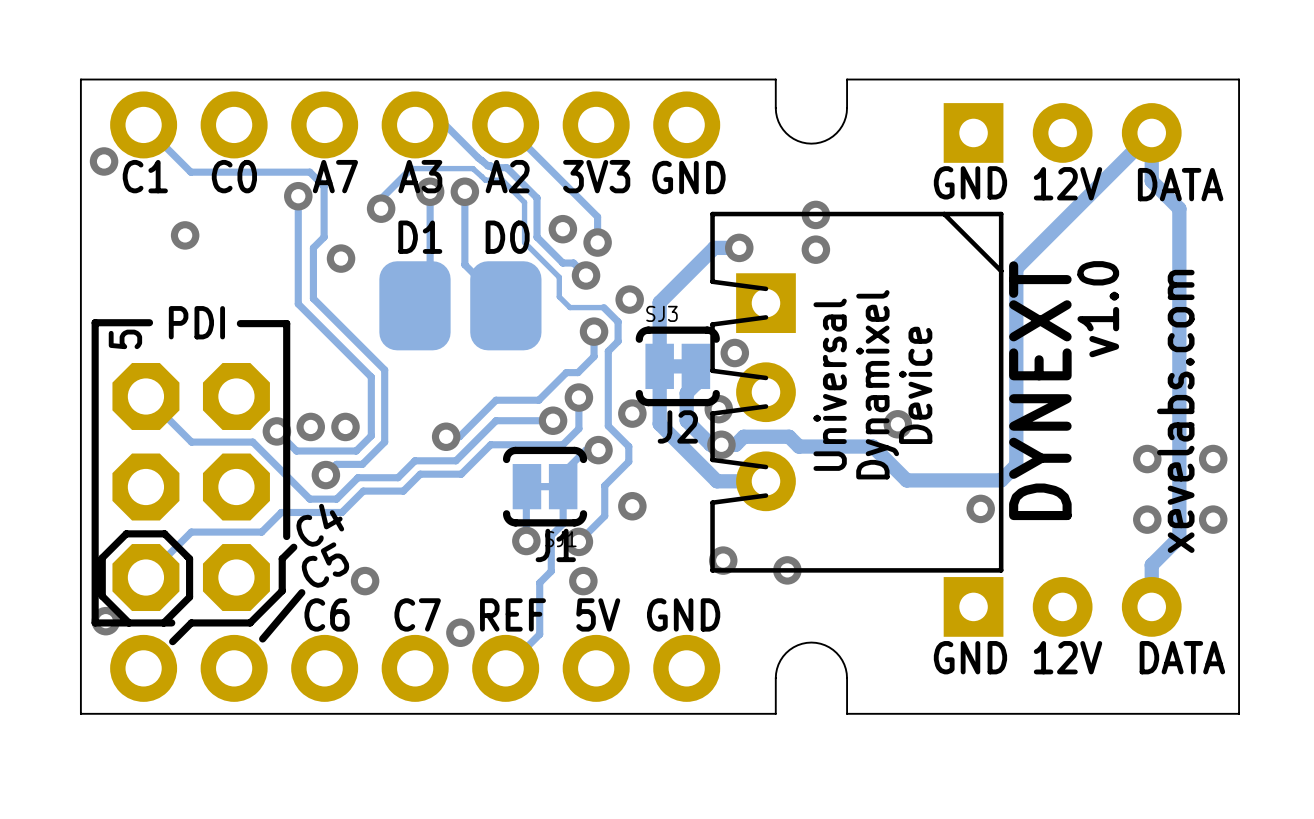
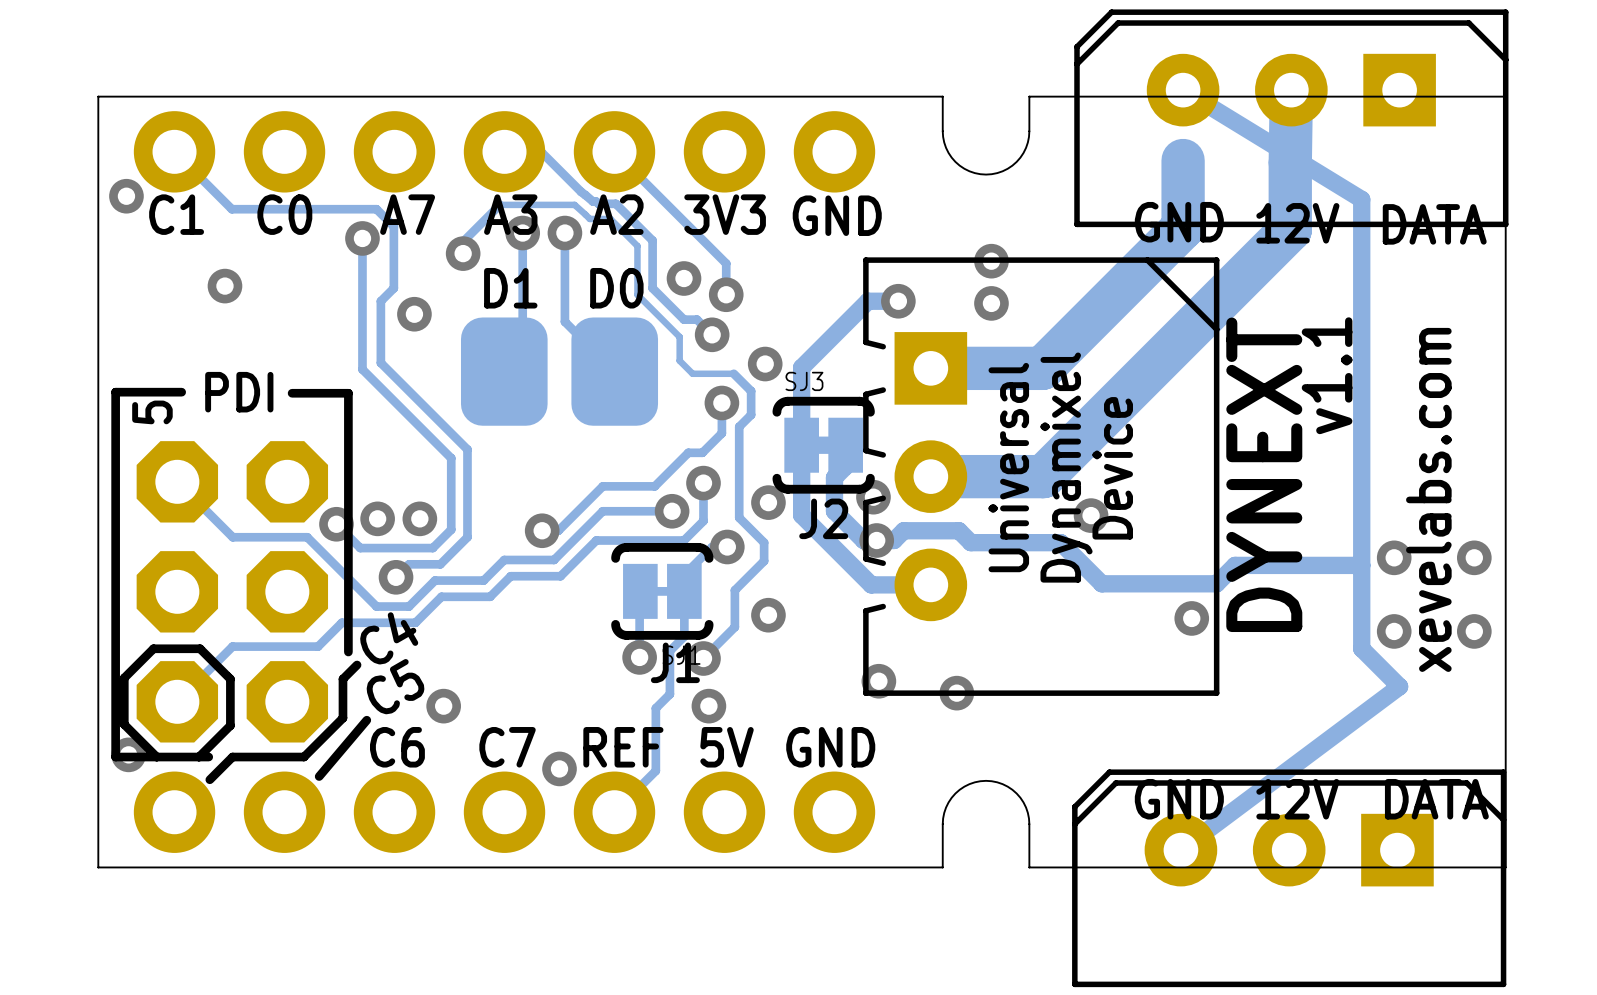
track: none -> (1183, 90) (1361, 199) (1361, 648) (1399, 686) (1180, 850)
track: none -> (1291, 90) (1290, 229) (1043, 476) (930, 476)
part footprint: [943, 103, 1182, 163] -> [1074, 9, 1509, 228]
track: none -> (1183, 160) (1183, 227) (1042, 368) (930, 368)
part footprint: [710, 211, 1004, 573] -> [863, 257, 1220, 696]
text: v1.0 (1098, 309) -> v1.1 (1327, 375)
via: (734, 353) -> none
track: (1016, 465) (1016, 268) (1151, 132) (1151, 181) (1179, 208) (1179, 537) (1151, 565) (1151, 606) -> (1235, 565) (1361, 565)
part: (1062, 606) -> none
part: none -> (1289, 878)

